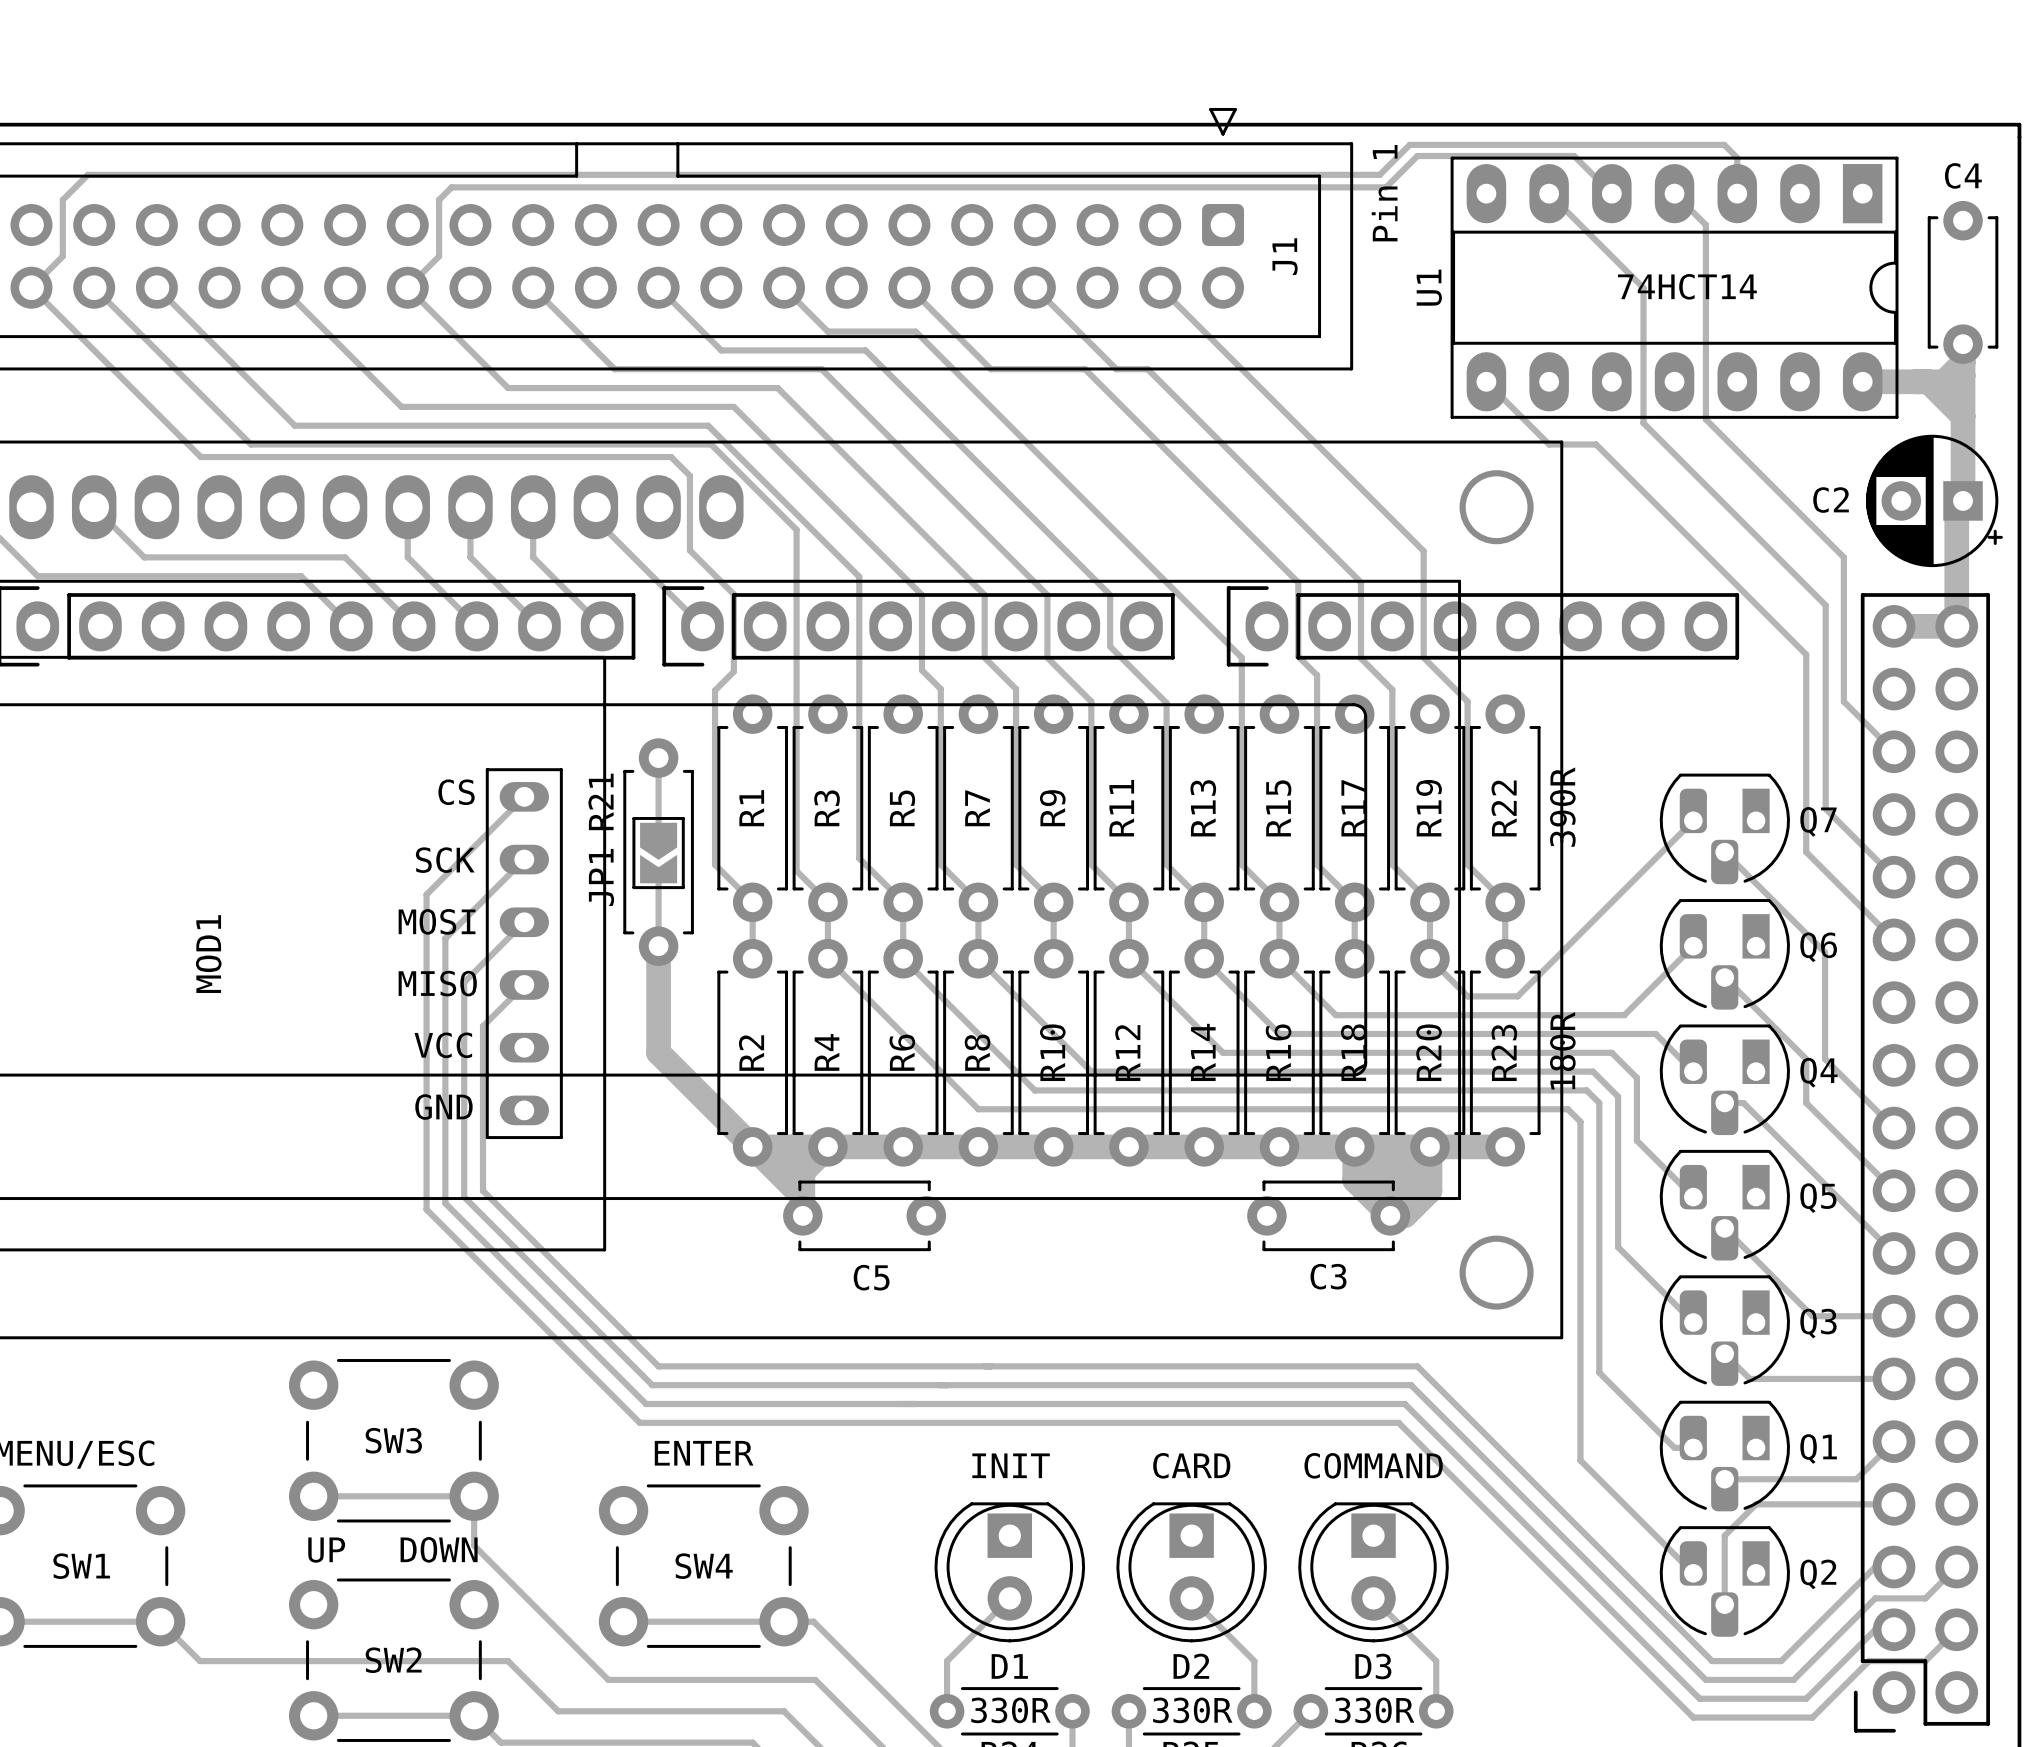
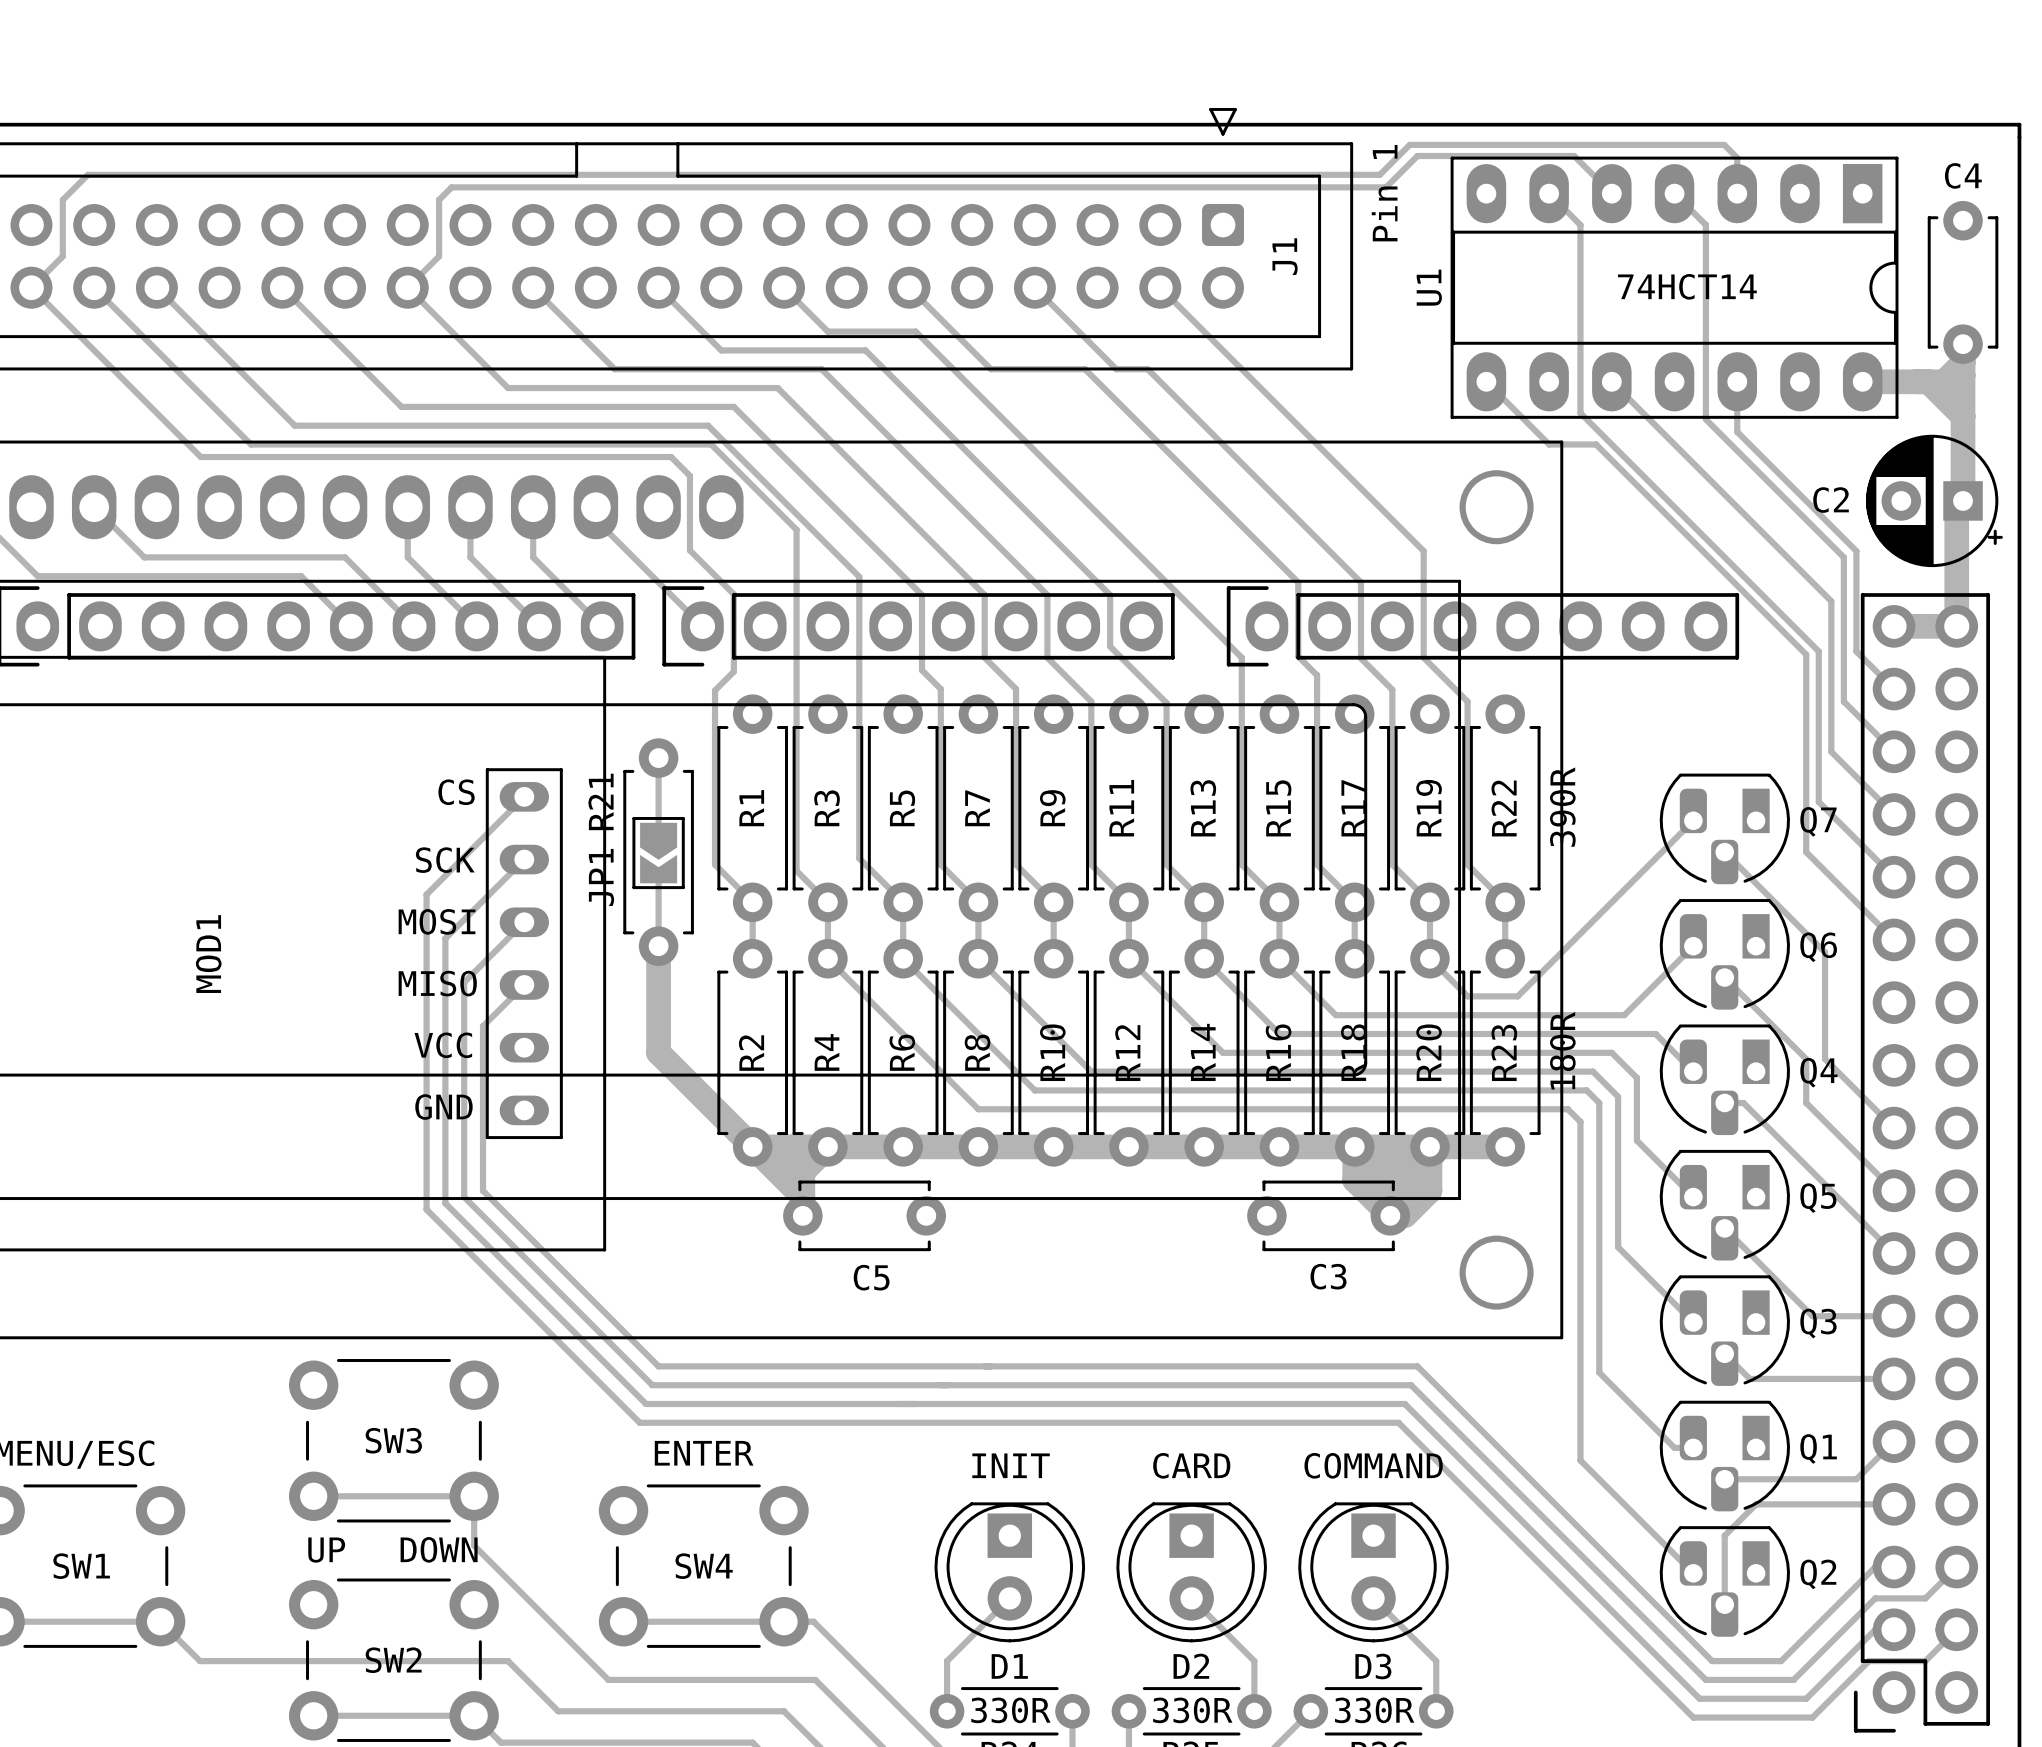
track: (1580, 225) (1643, 288) (1643, 423) (1825, 605) (1825, 808) -> (1580, 225) (1580, 413) (1818, 651) (1818, 801) (1825, 808)
track: none -> (1611, 381) (1831, 601) (1831, 751) (1894, 814)
track: none -> (1737, 381) (1737, 431) (1856, 551) (1856, 651) (1894, 689)

